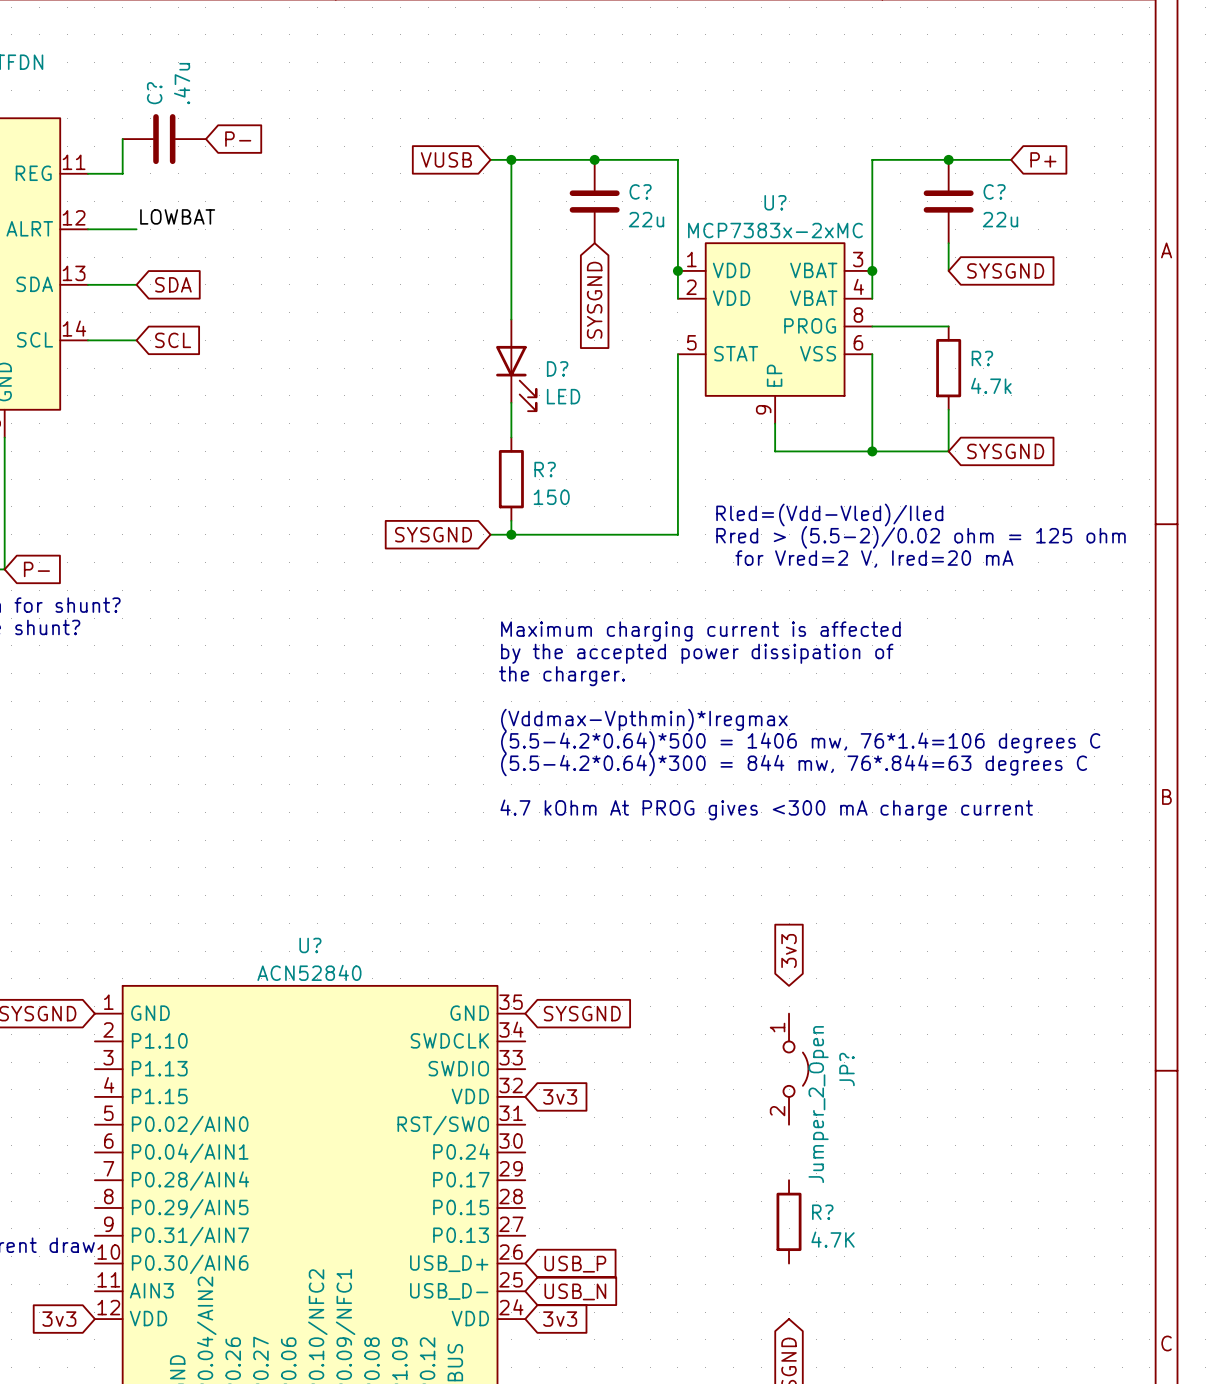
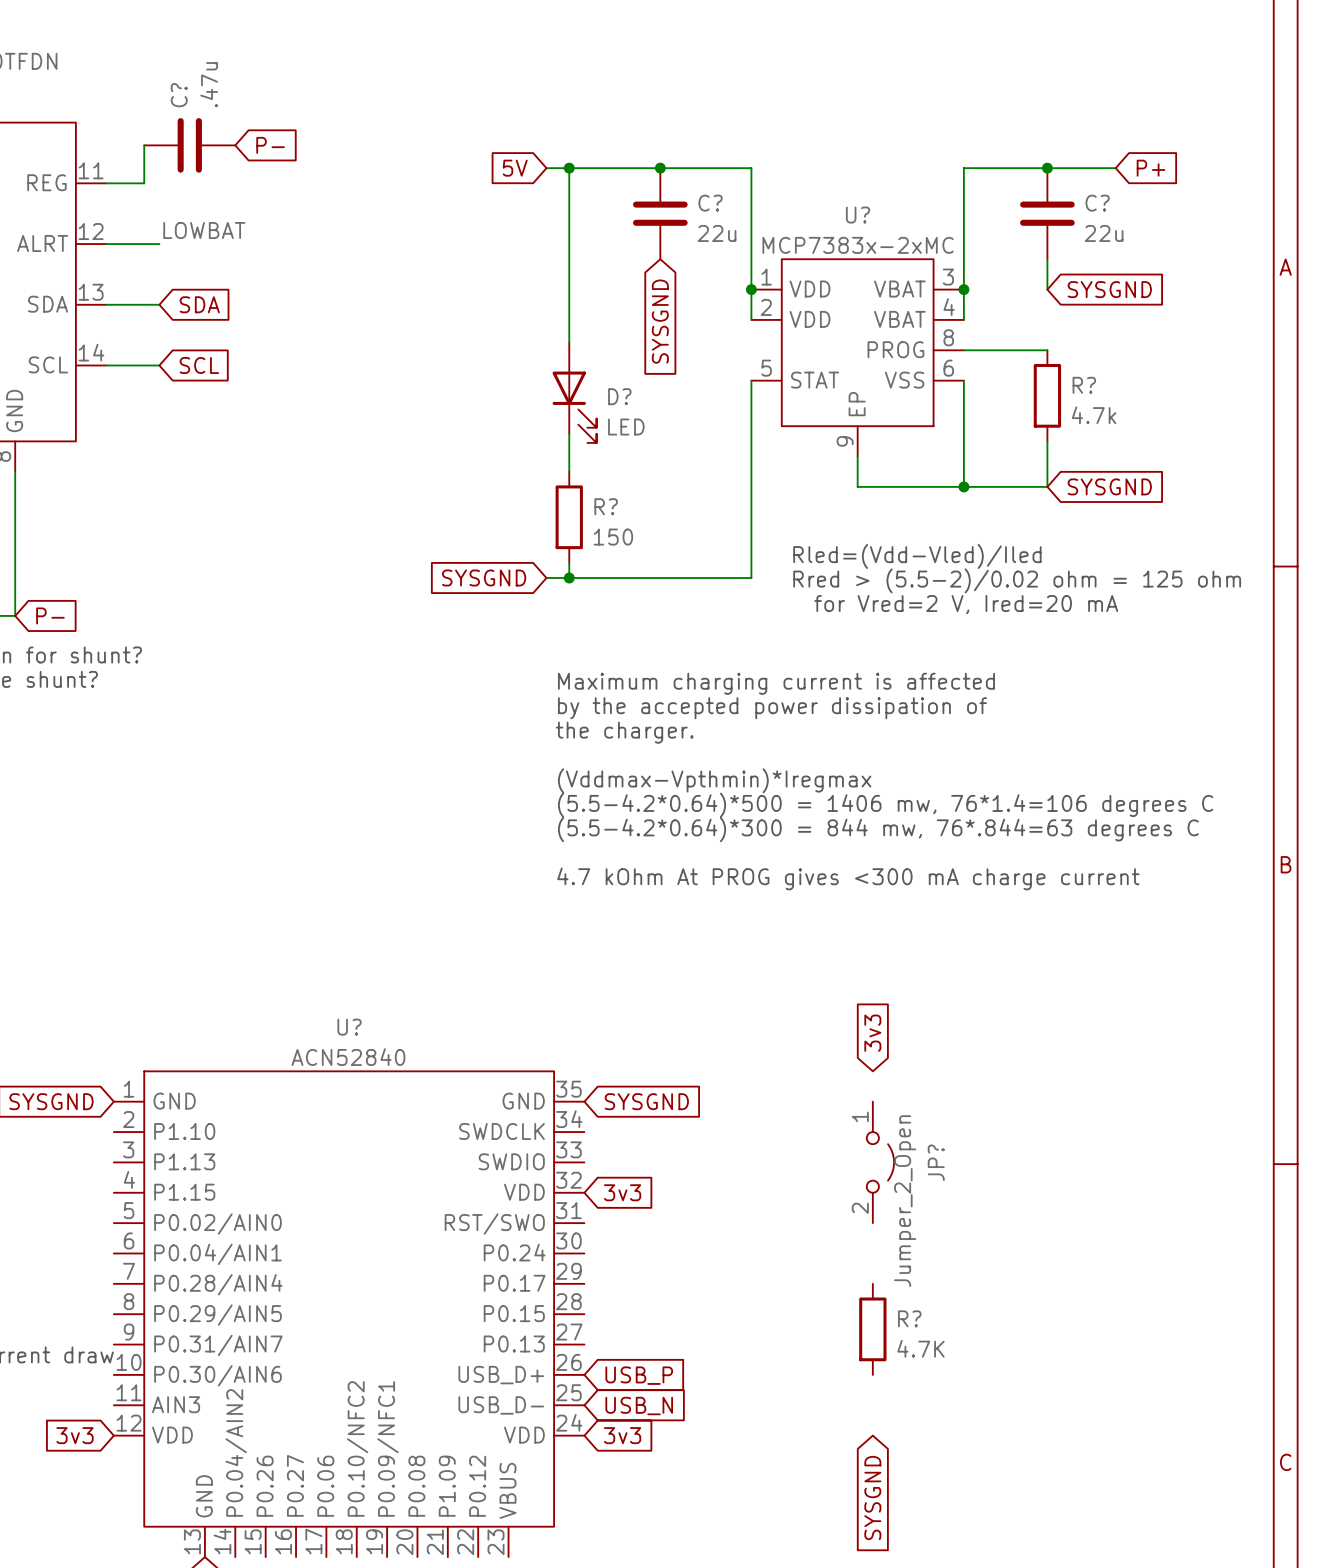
global label: VUSB (446, 159) -> 5V (515, 168)

